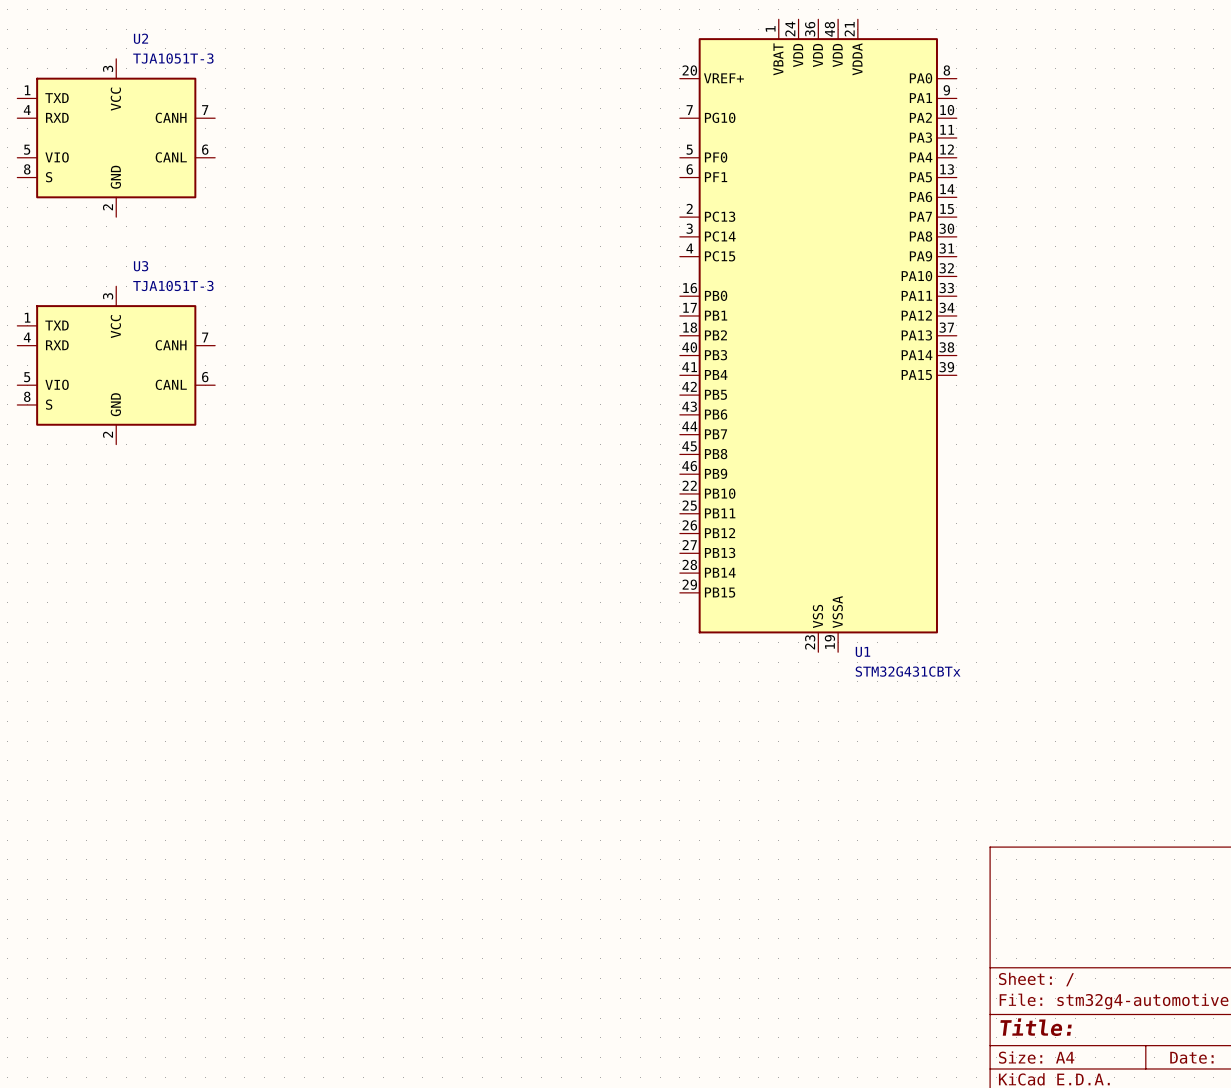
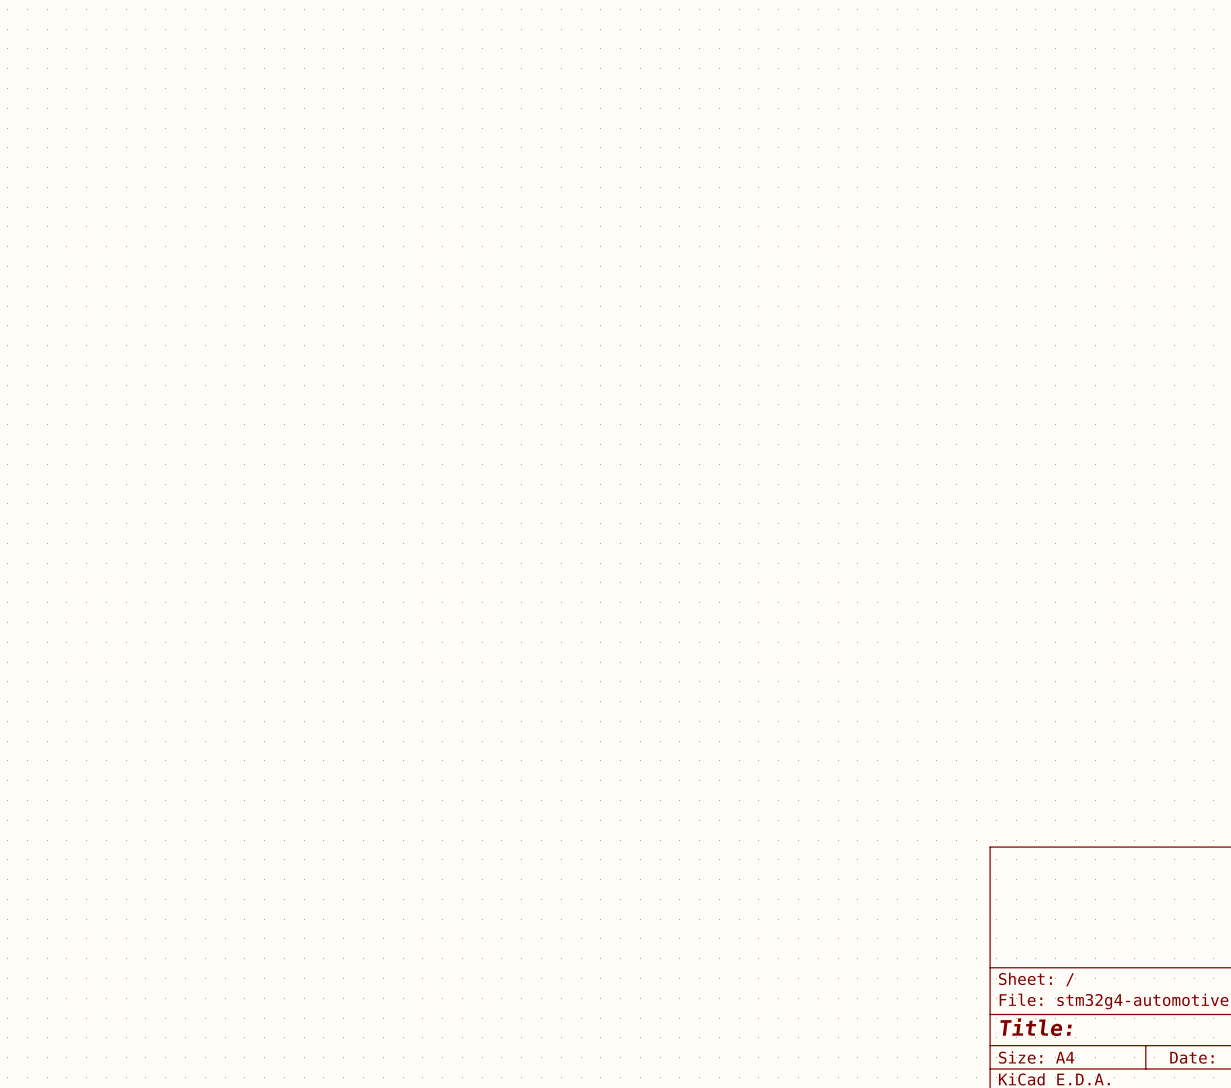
U2: TJA1051T-3 (116, 137) -> none
U1: STM32G431CBTx (818, 335) -> none
U3: TJA1051T-3 (116, 365) -> none

